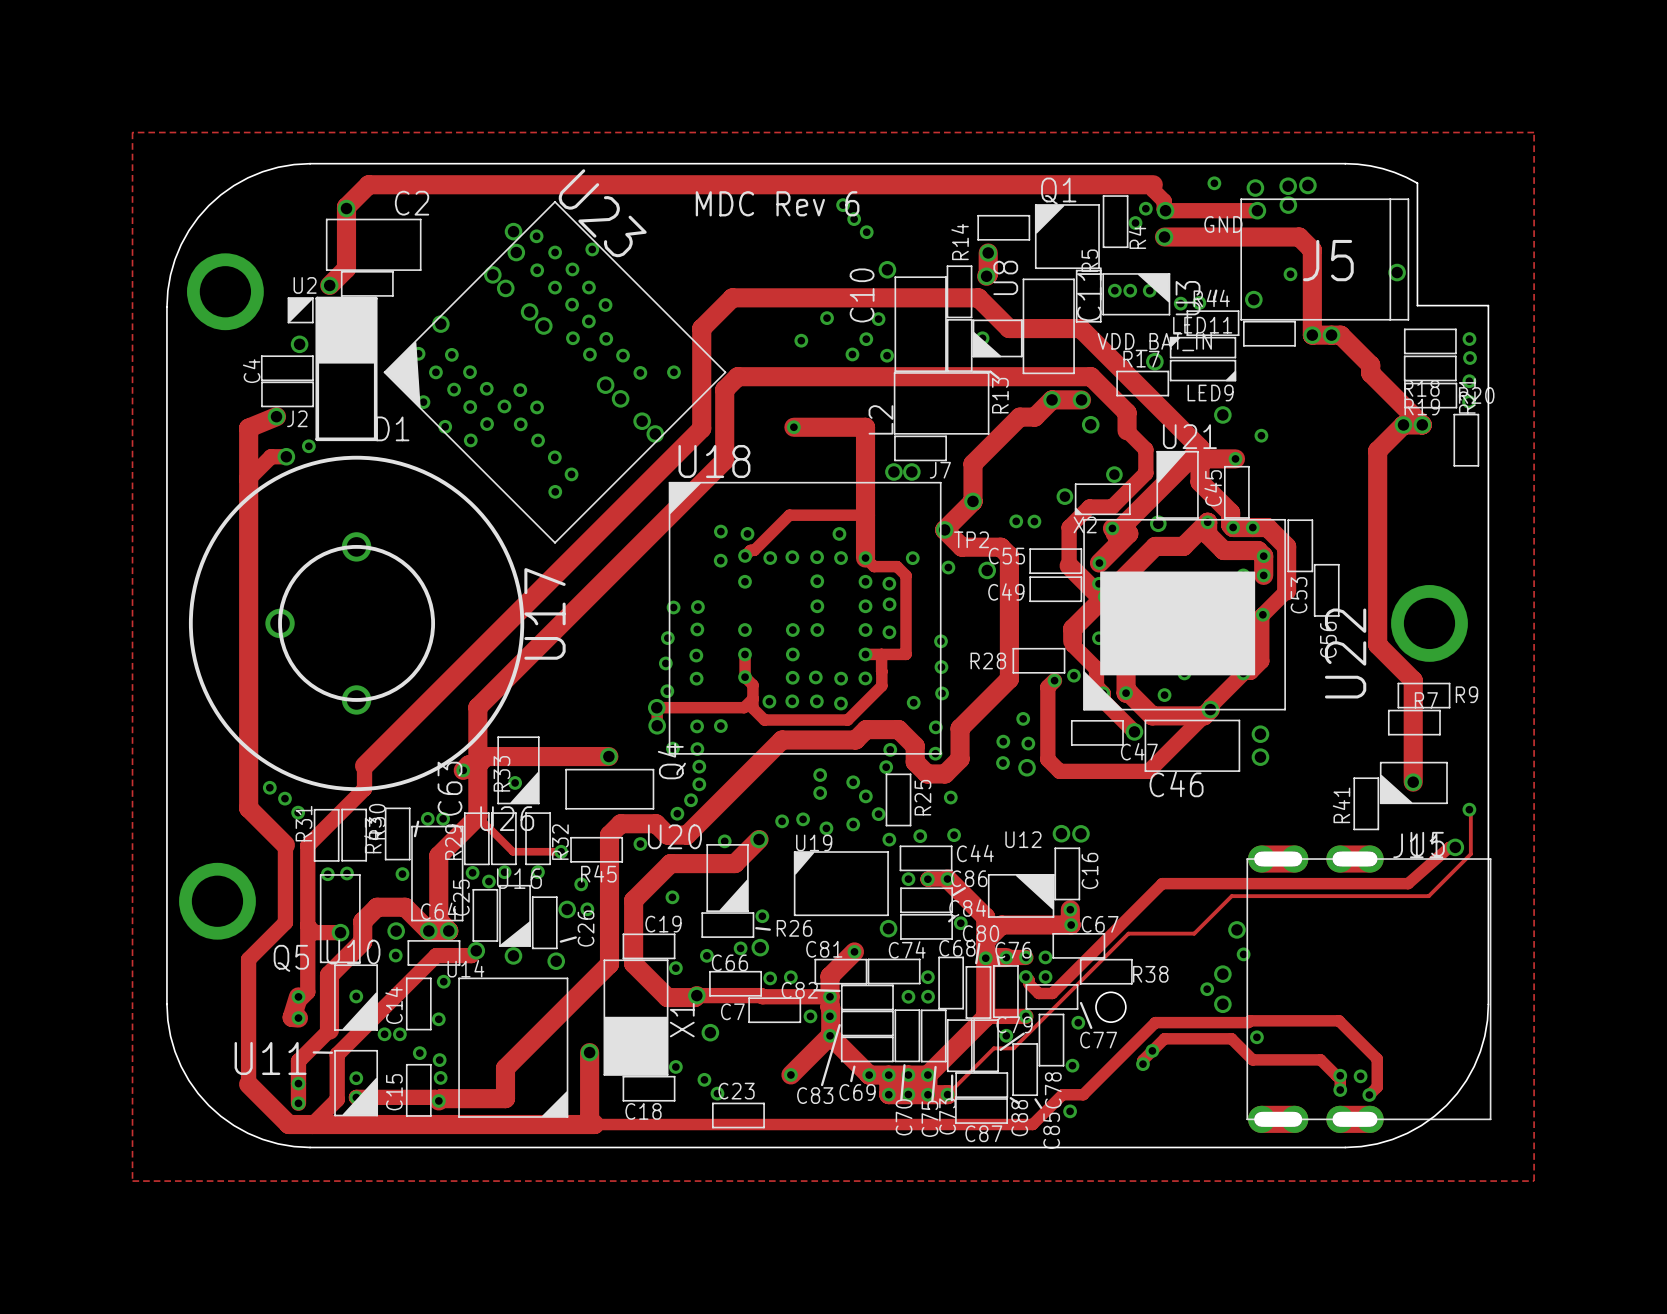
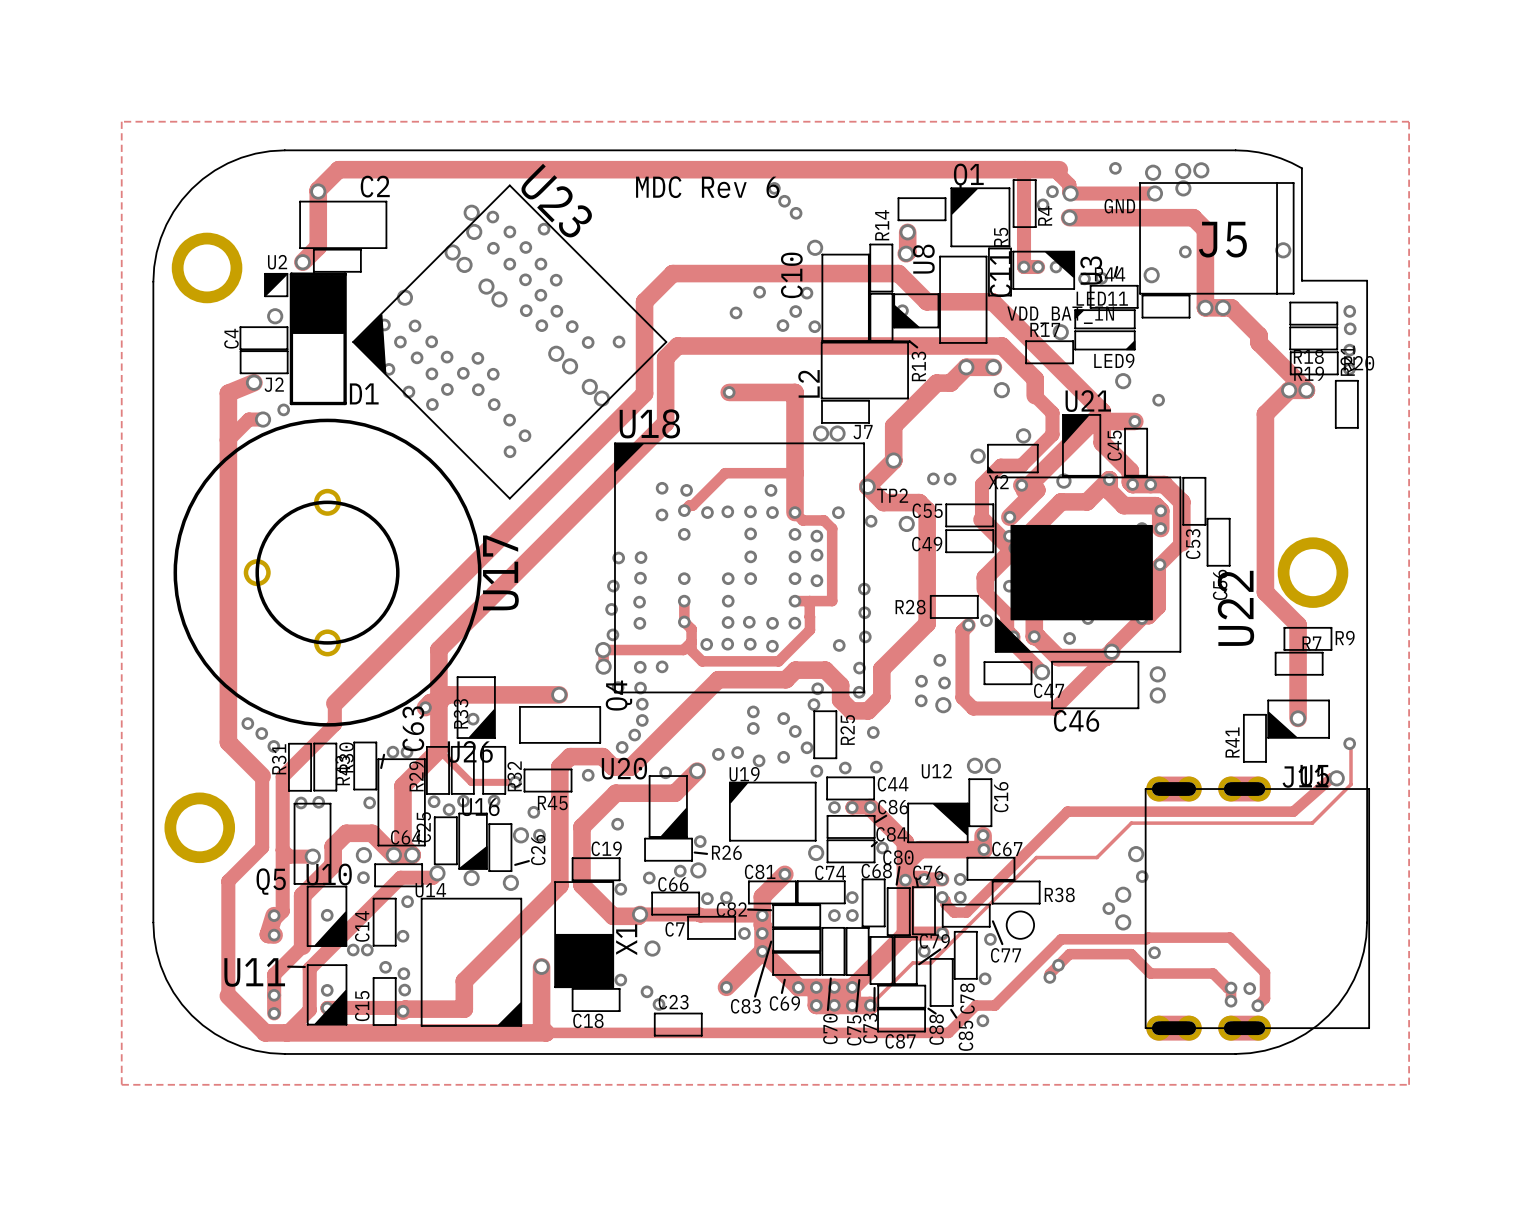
track: none -> (1025, 169) (1024, 266) (1038, 266)

